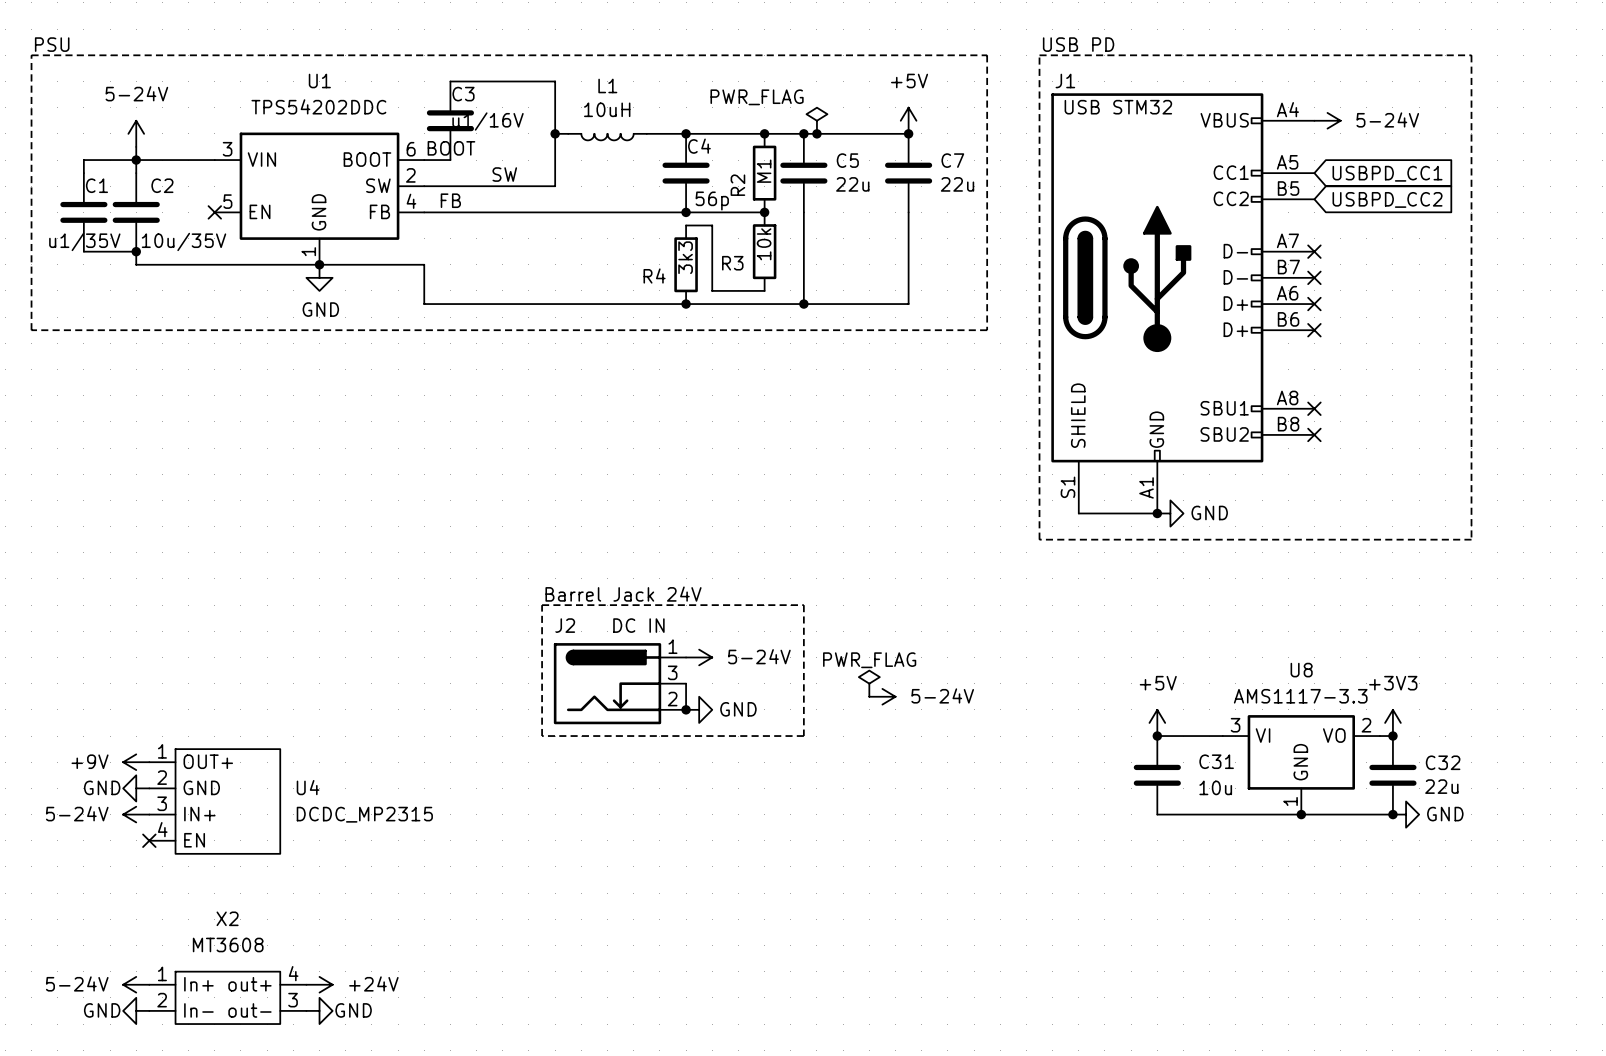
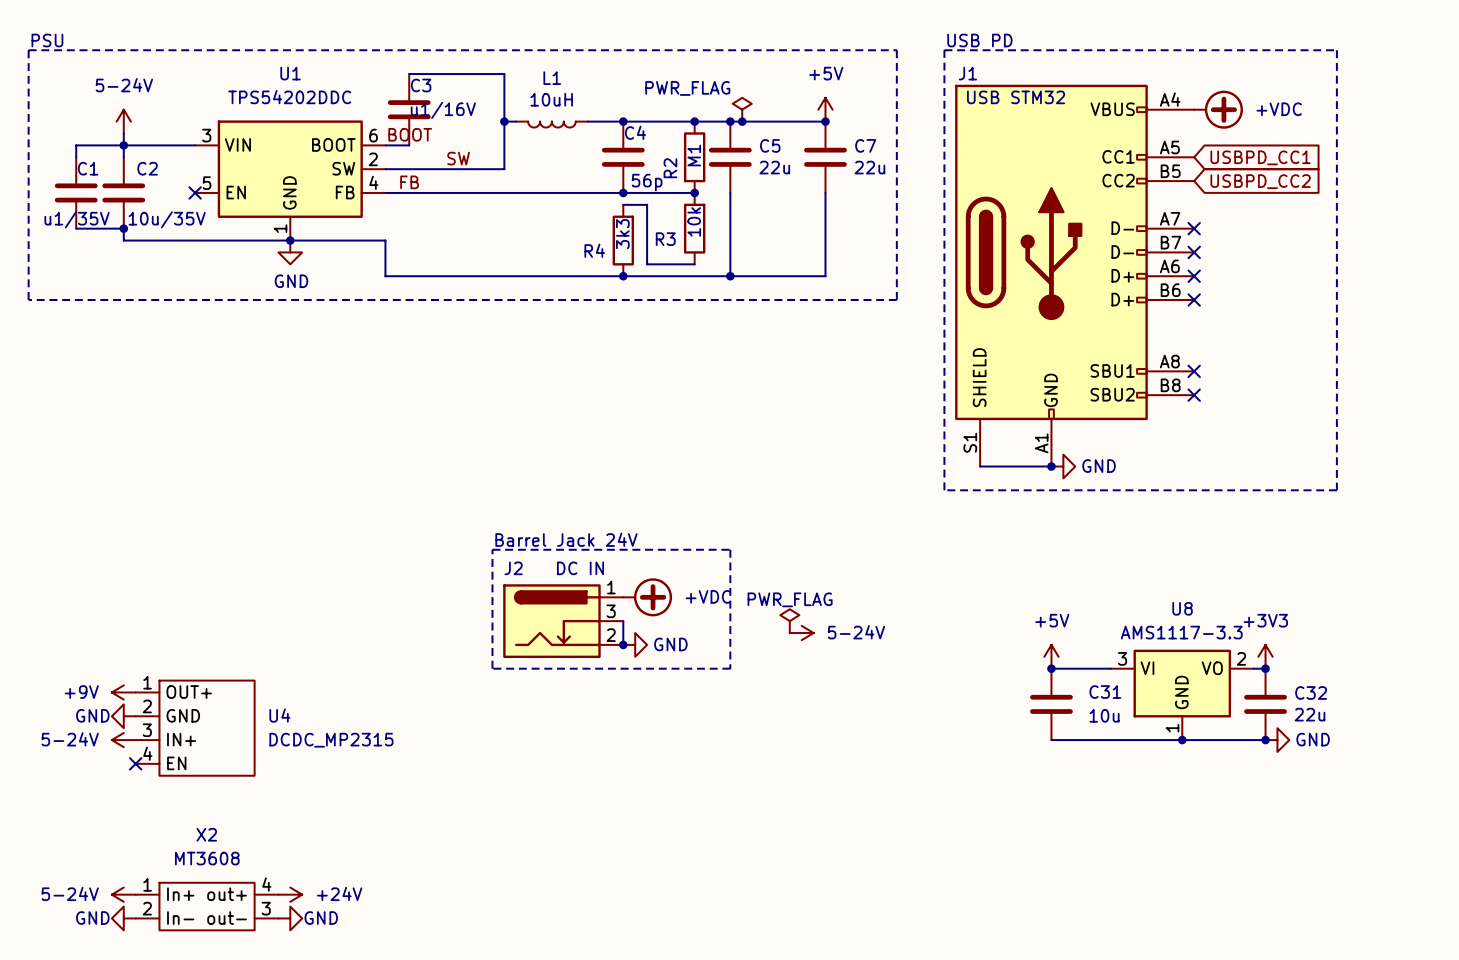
power symbol: 5-24V (1327, 120) -> none
power symbol: none -> +VDC (1218, 109)
power symbol: 5-24V (699, 657) -> none
power symbol: none -> +VDC (647, 597)

